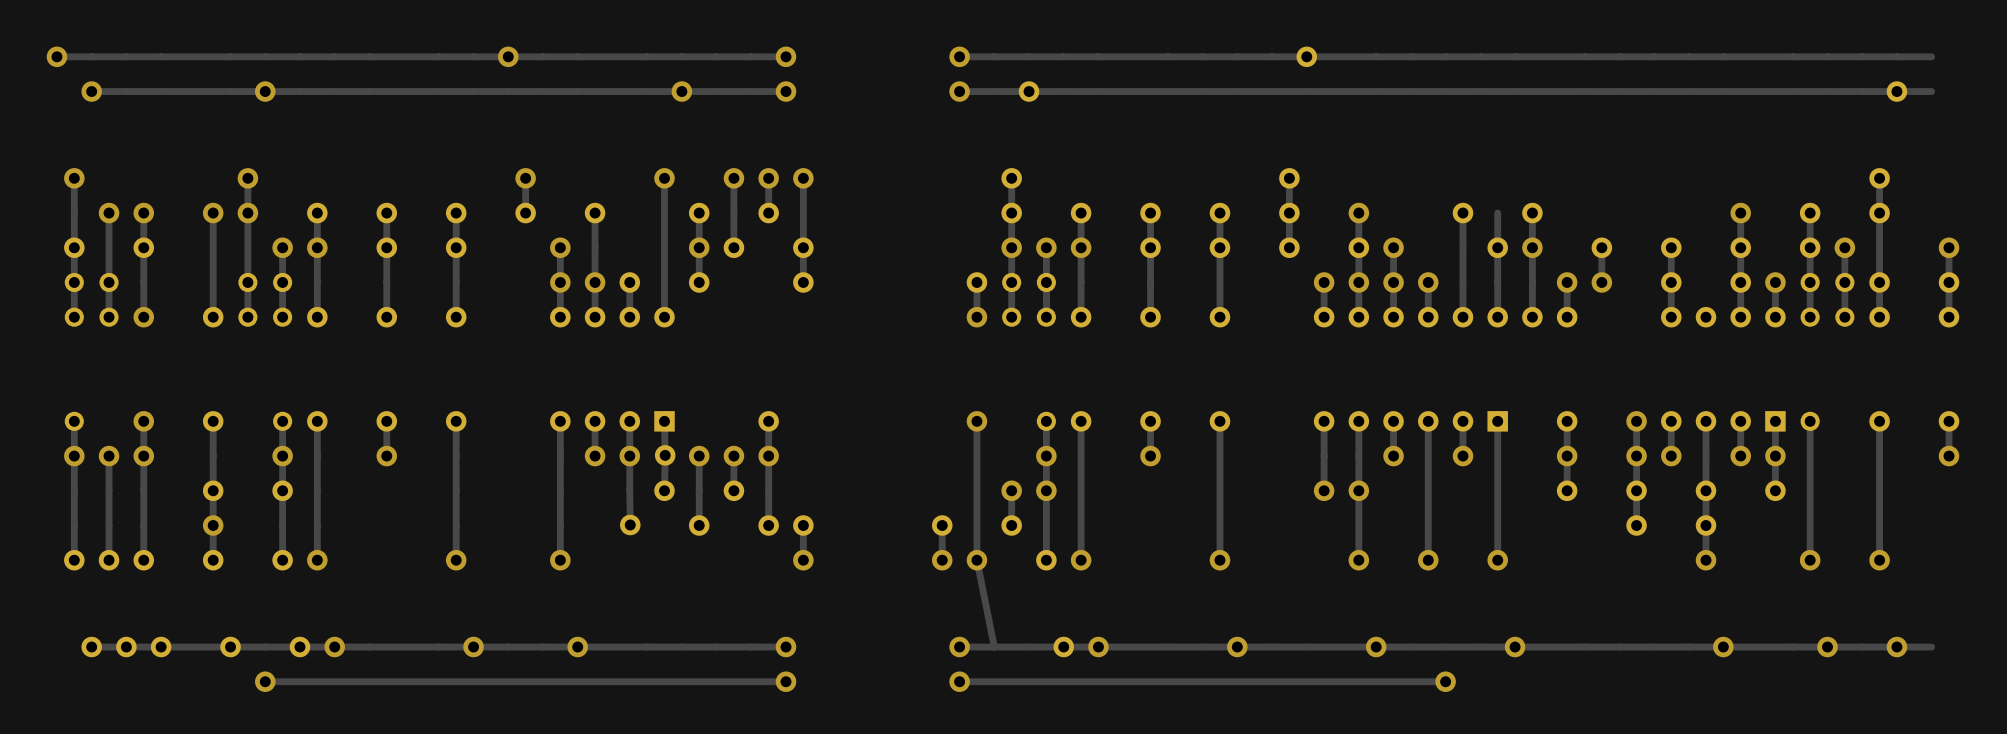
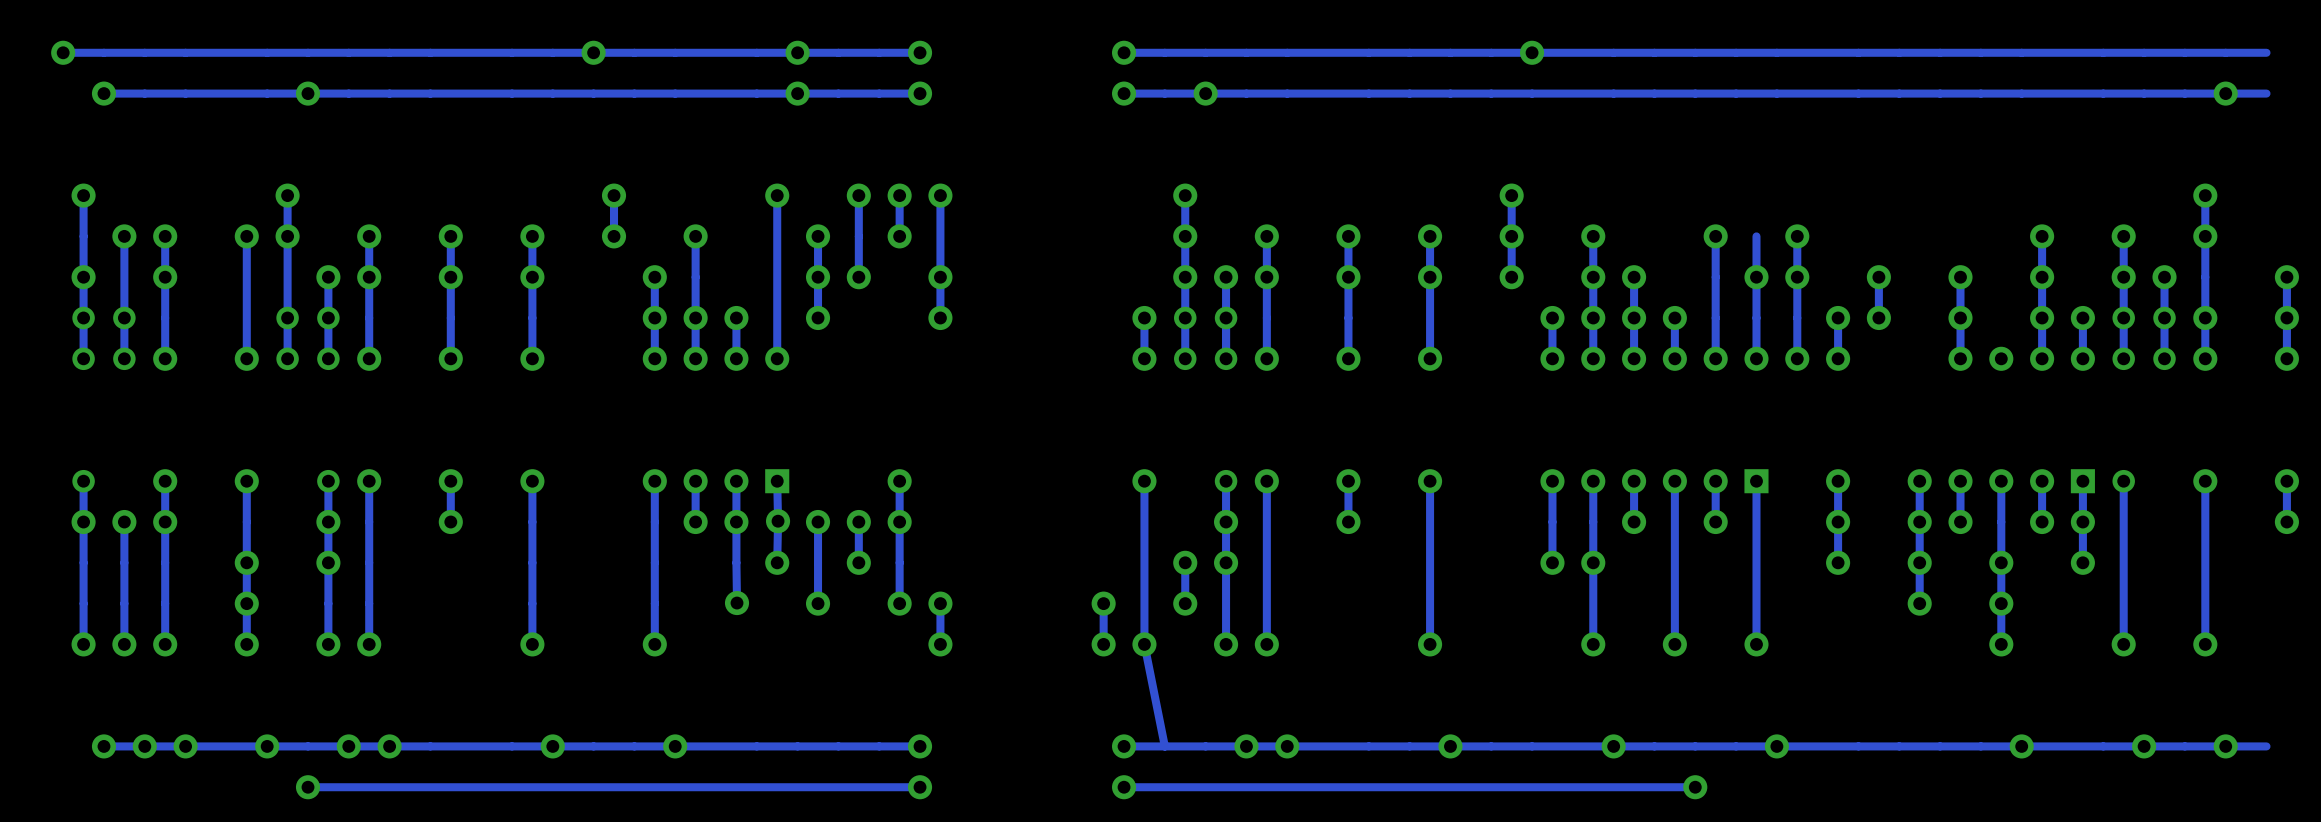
via: none -> (797, 52)

